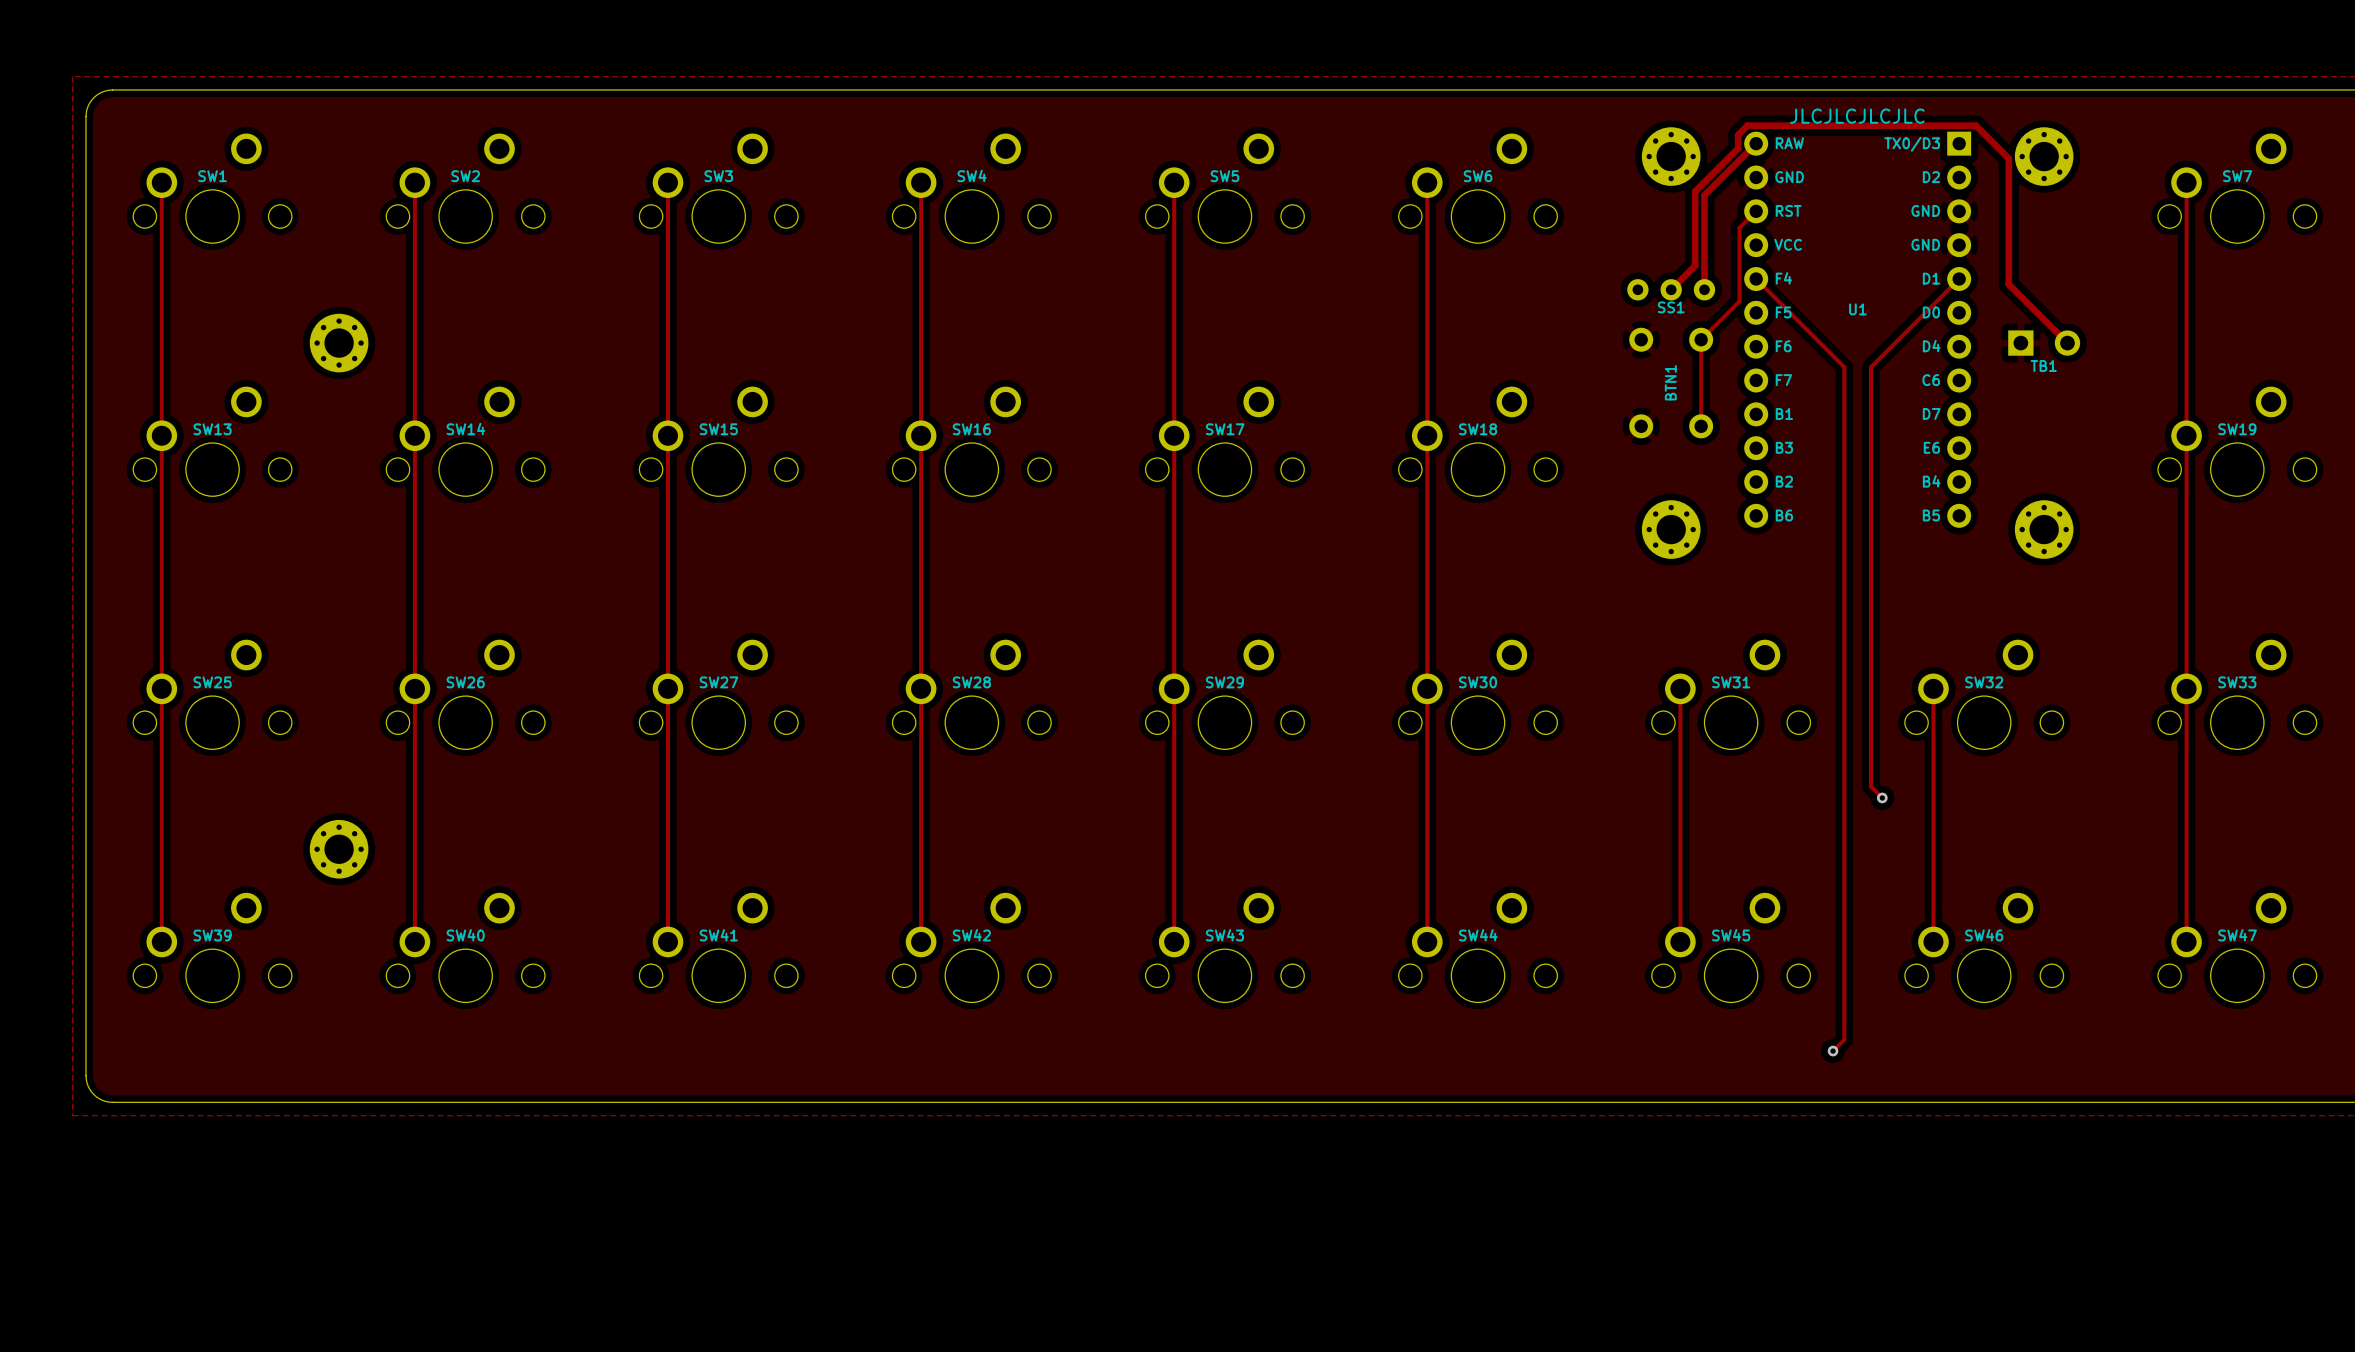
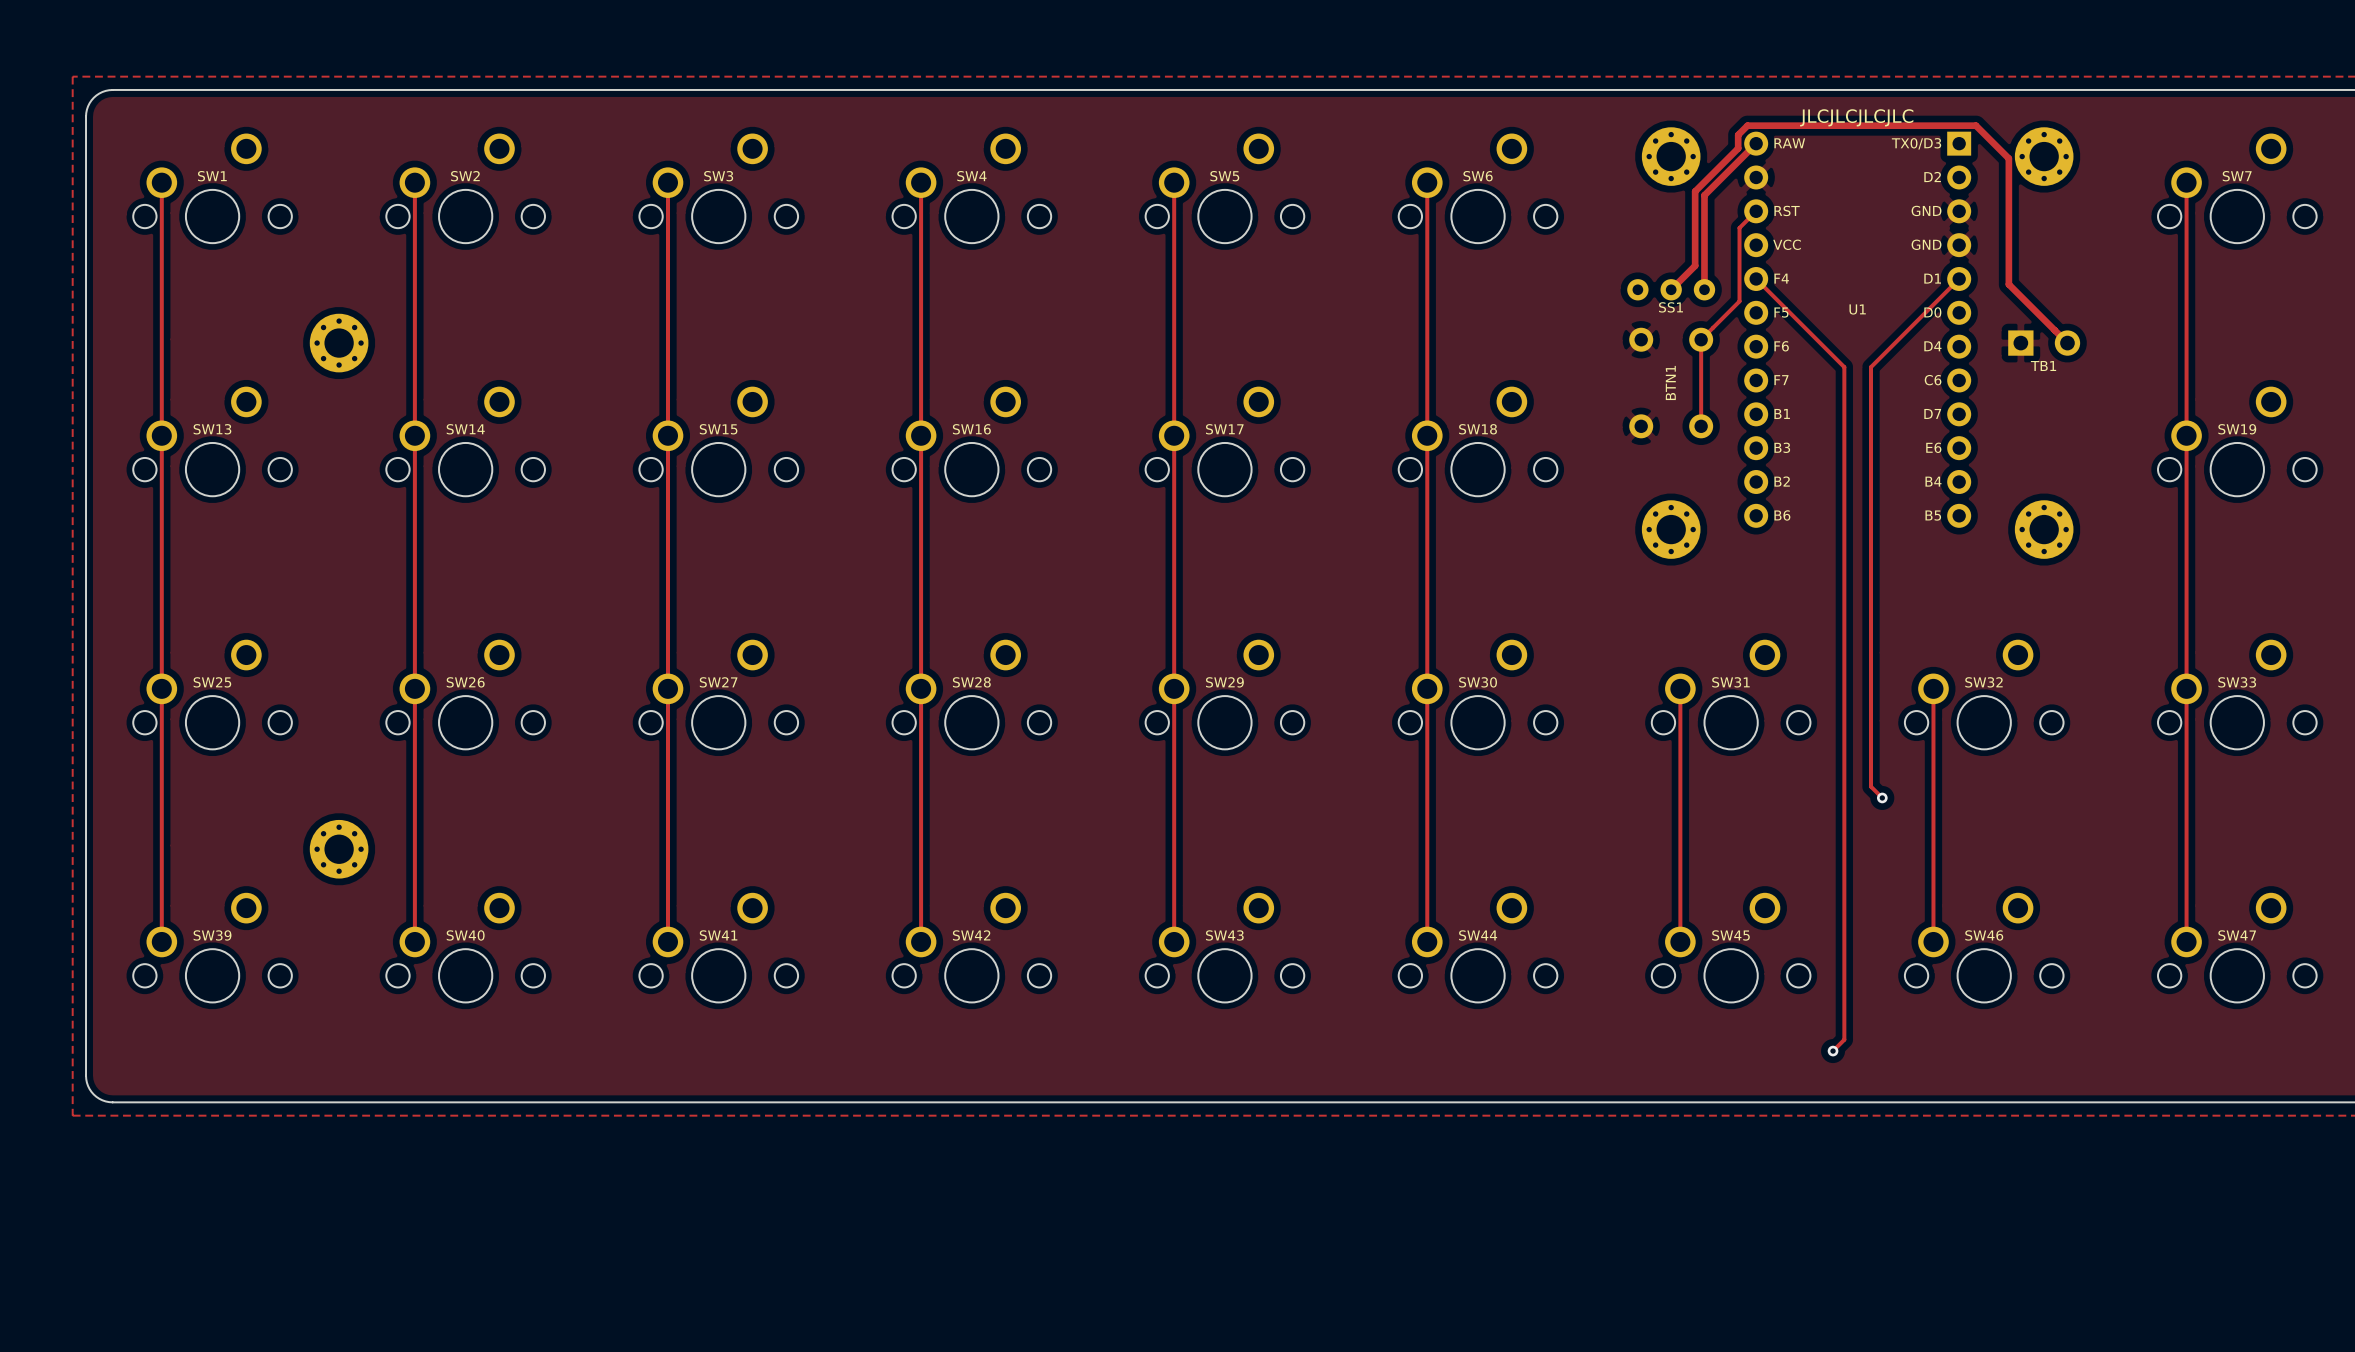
U1 text: GND (1789, 177) -> none

